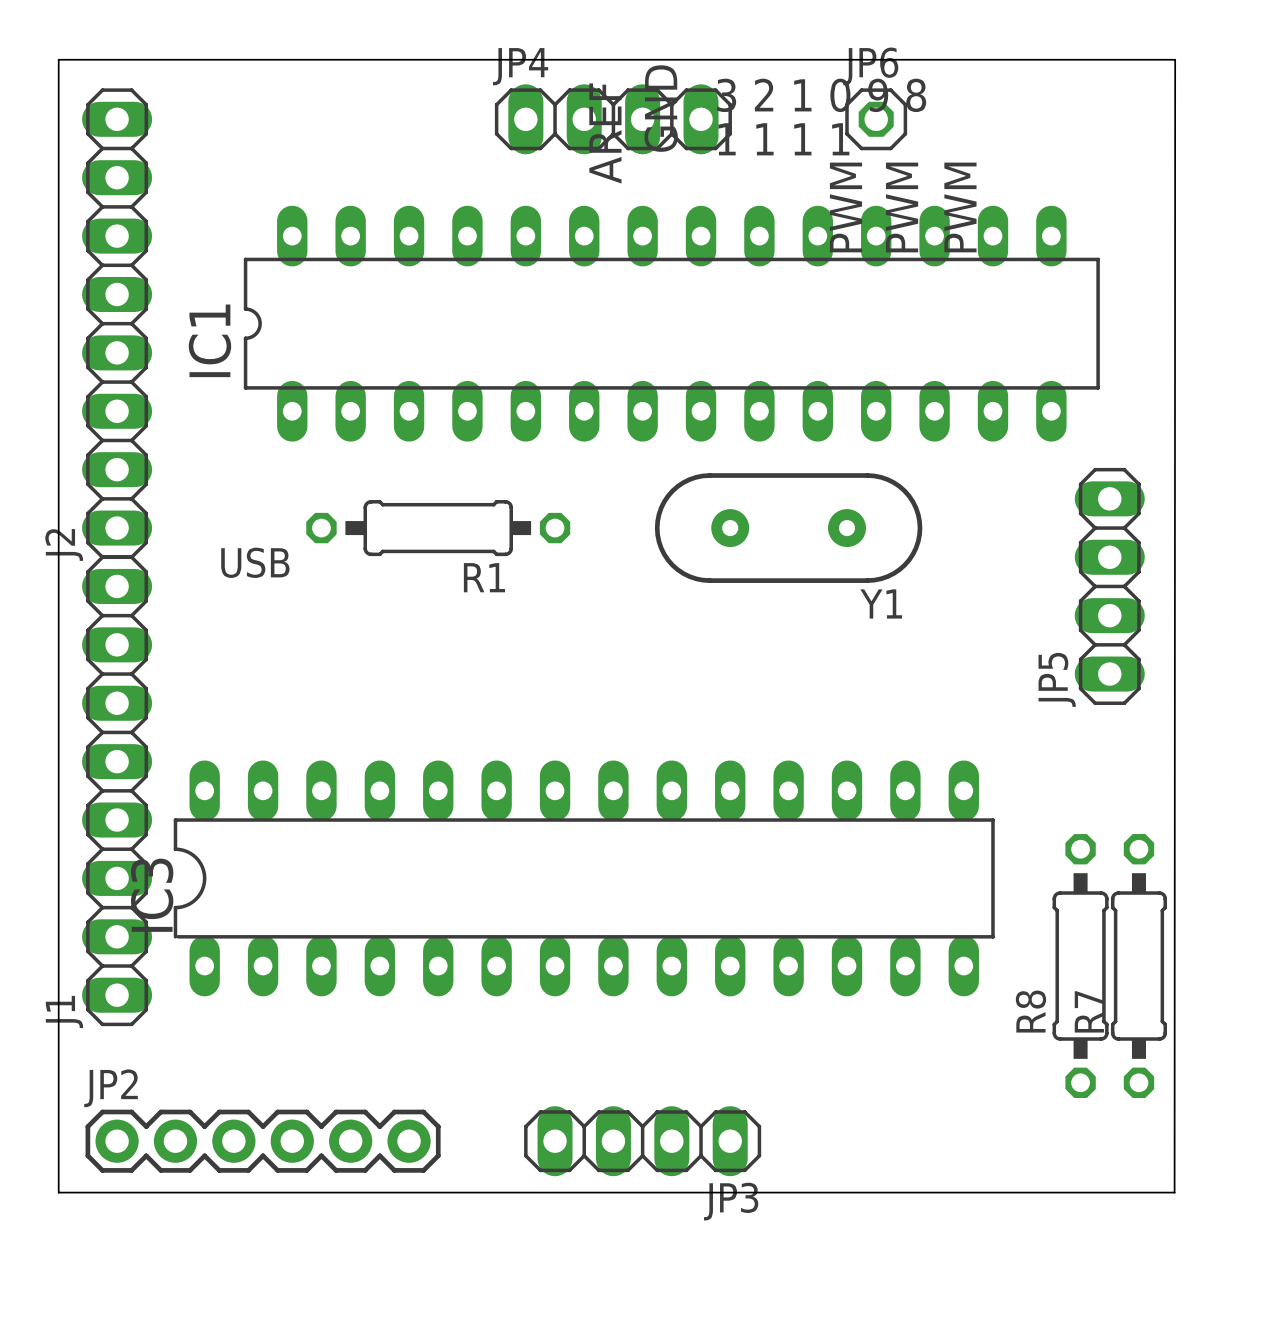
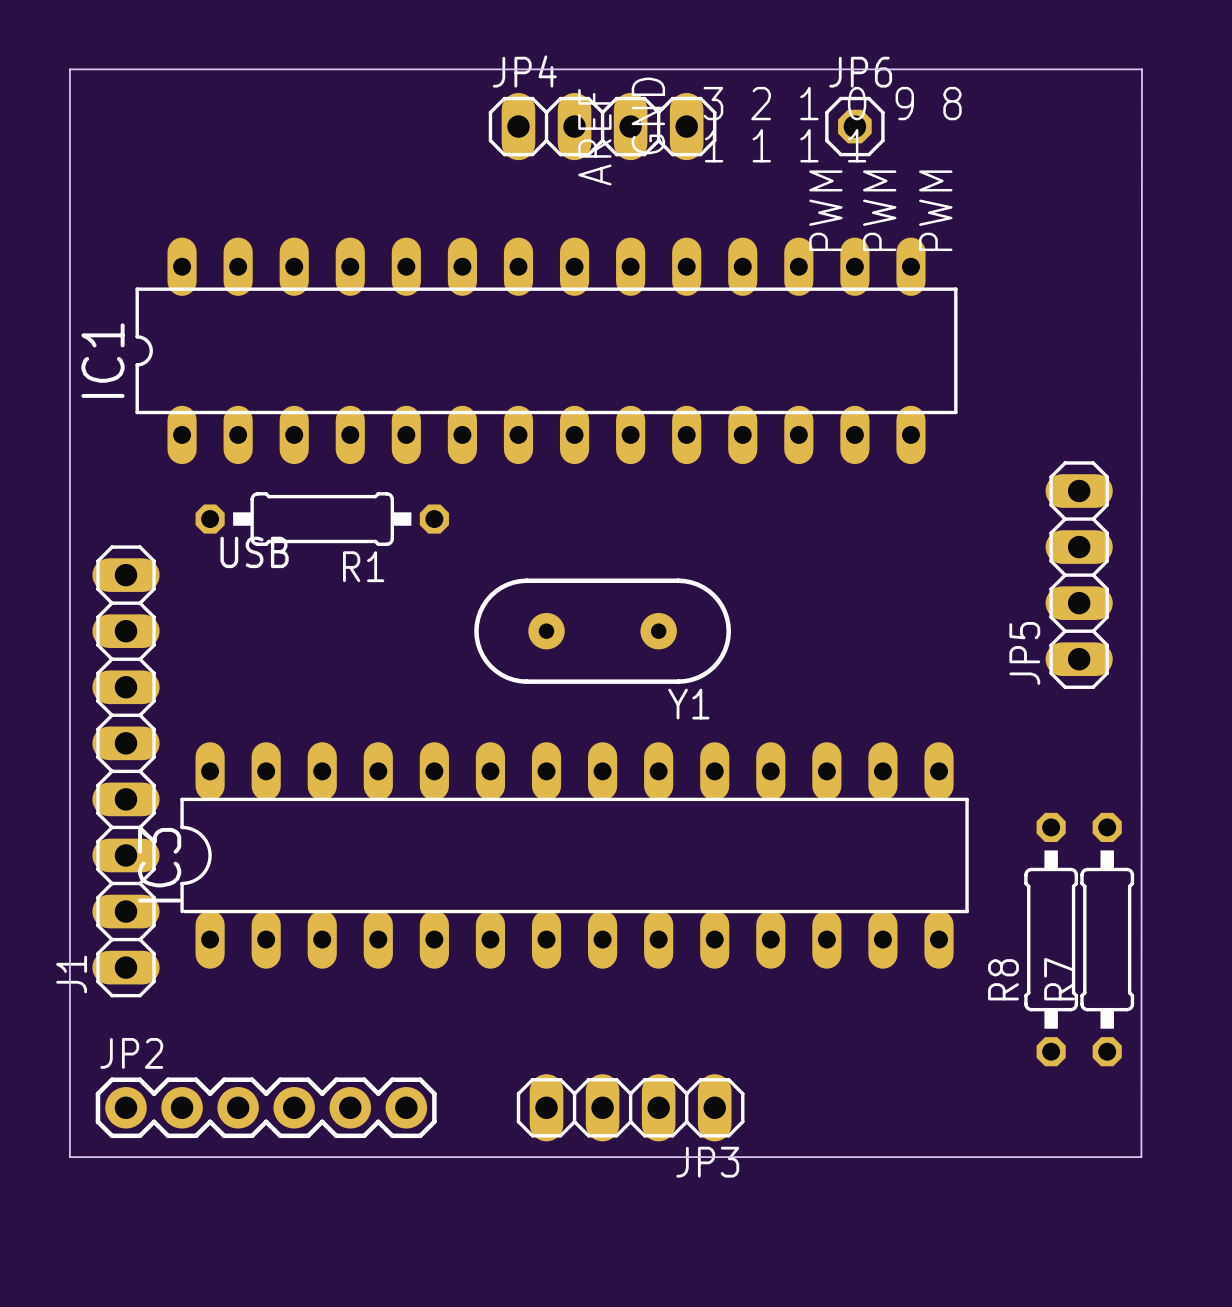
J2: (117, 323) -> none
IC1 position: (671, 323) -> (546, 350)
R1 position: (438, 528) -> (322, 519)
Y1 position: (788, 528) -> (602, 631)

